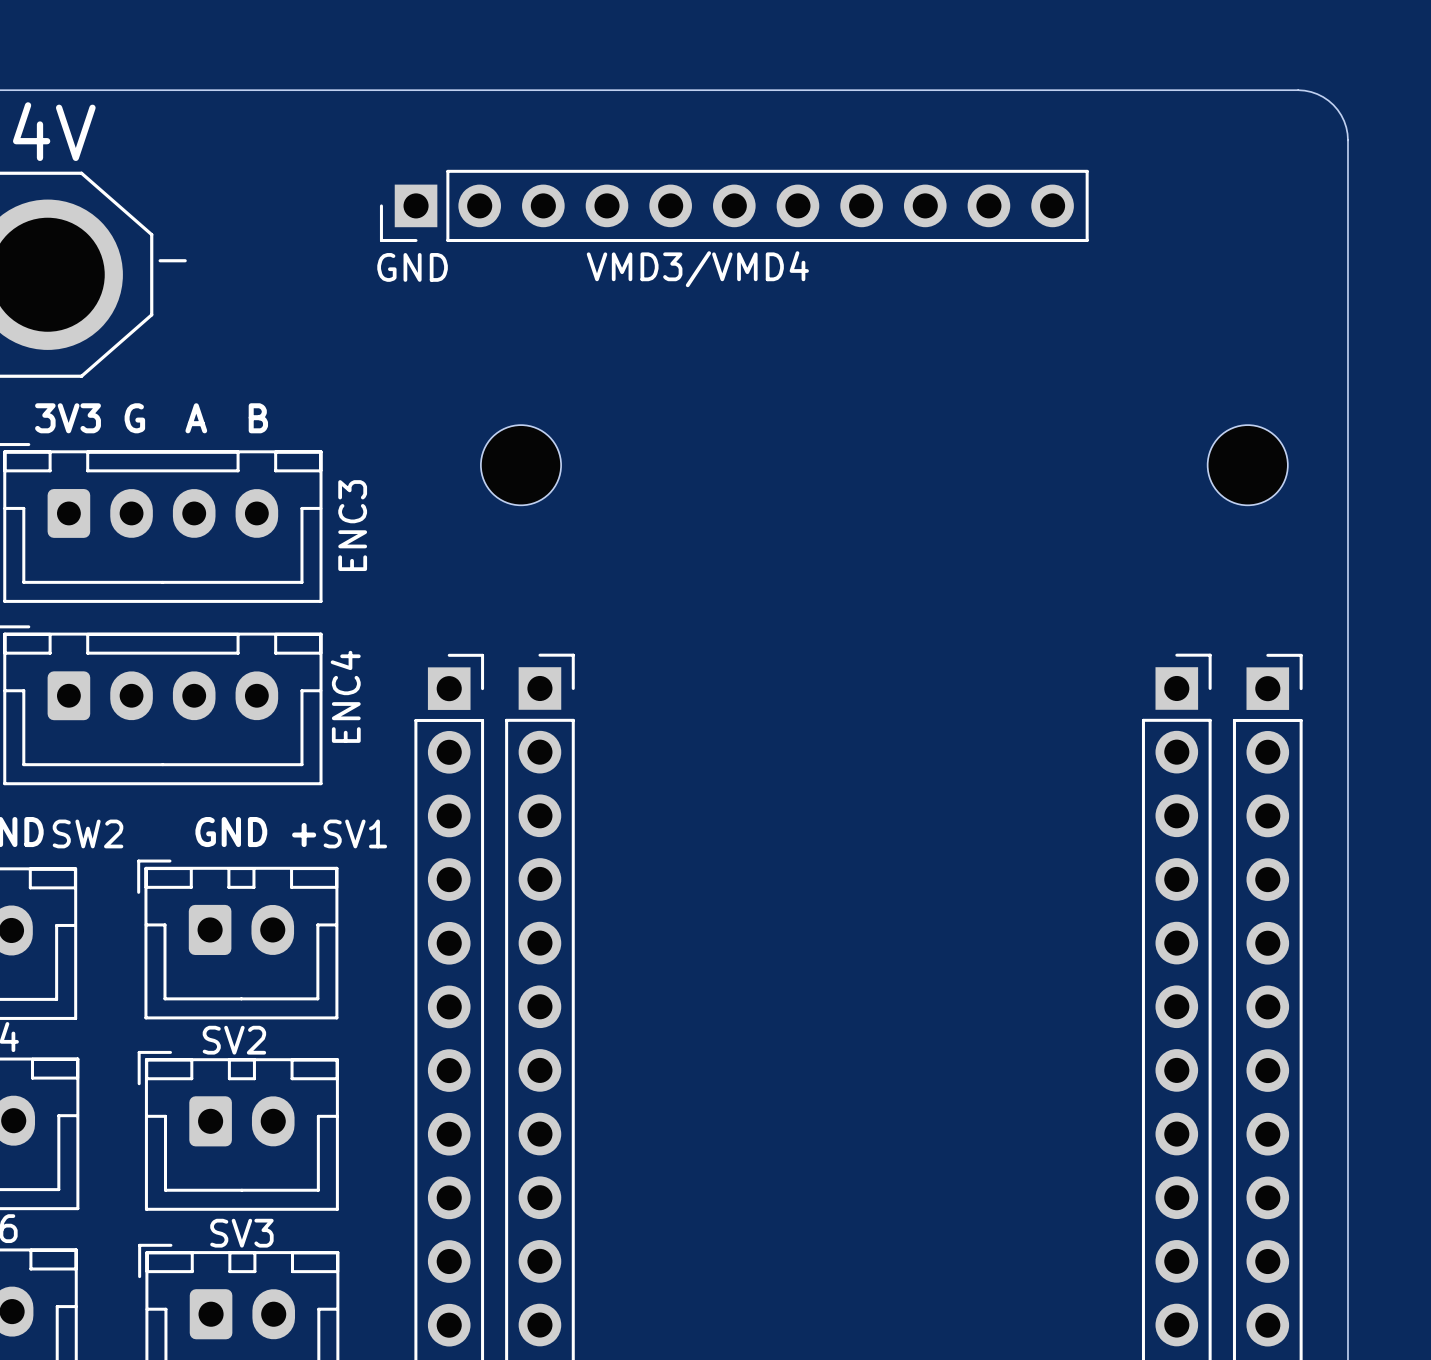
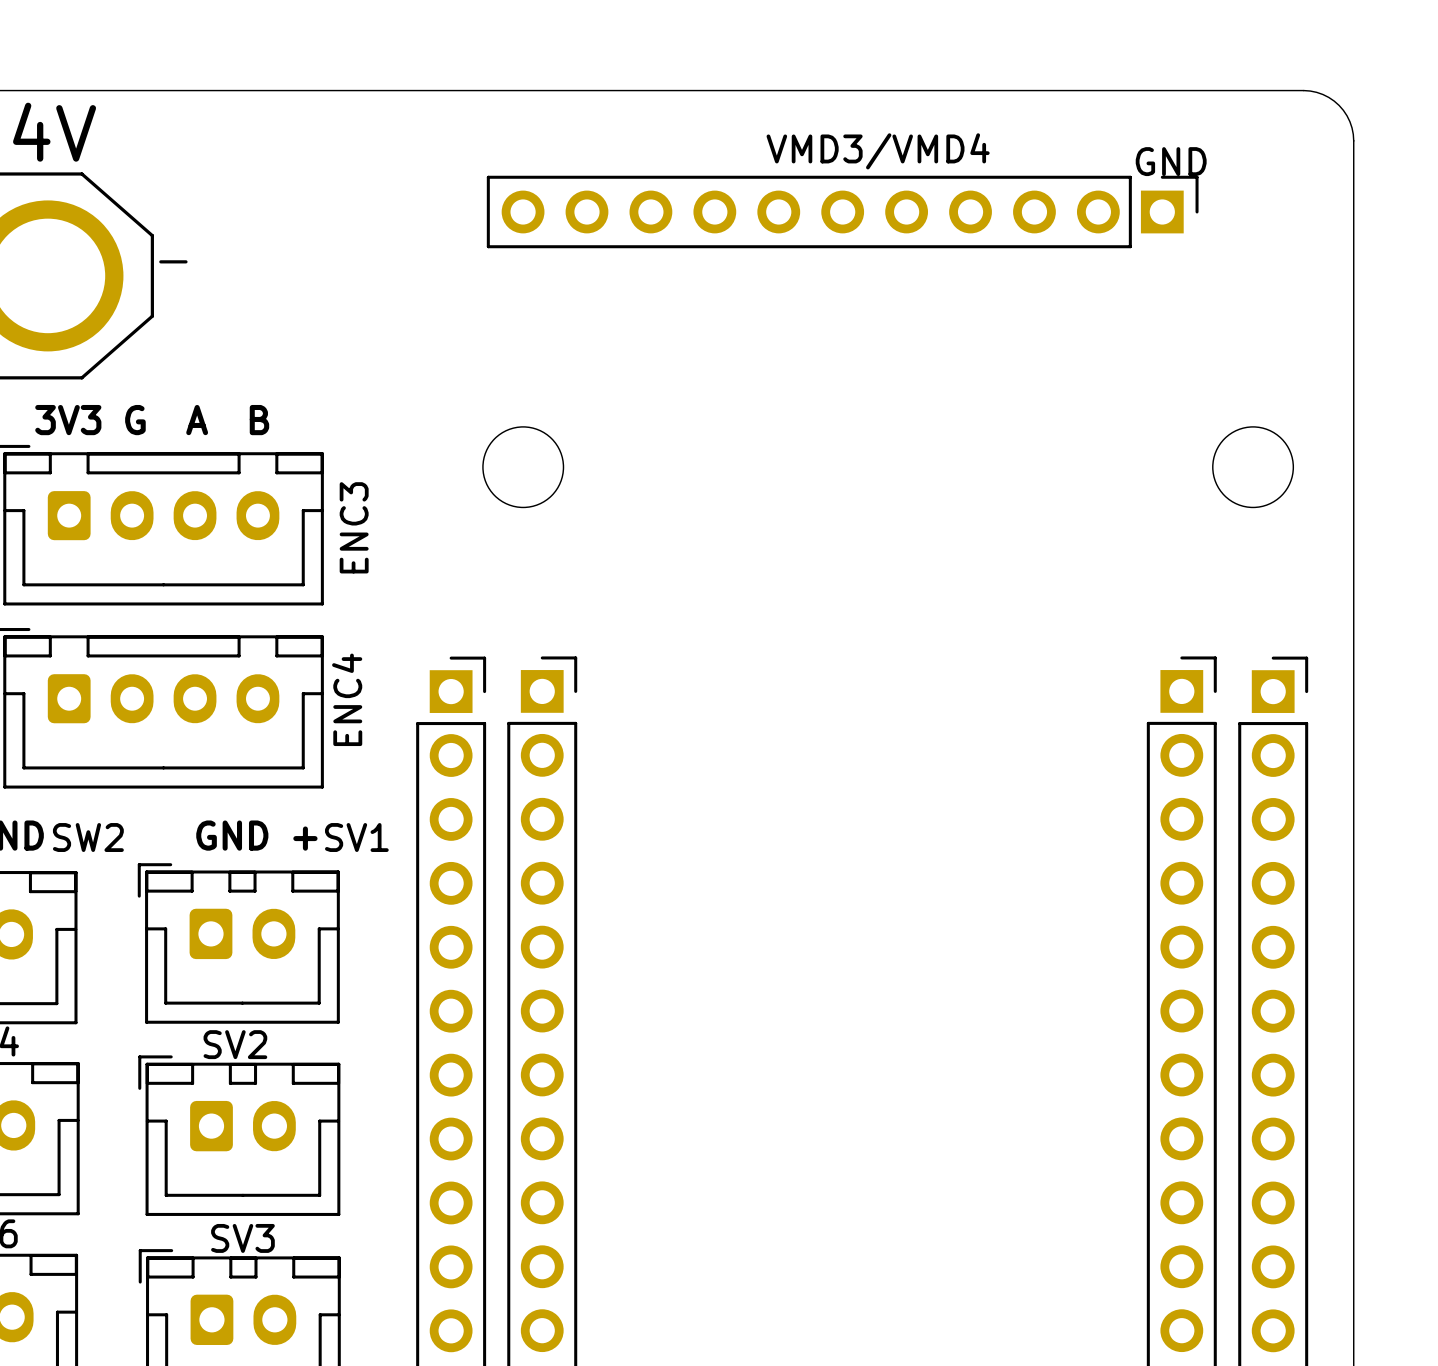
text: none -> GND (1171, 161)
VMD3/VMD4 rotation: 0° (734, 205) -> 180° (842, 211)
text: GND (412, 267) -> none

